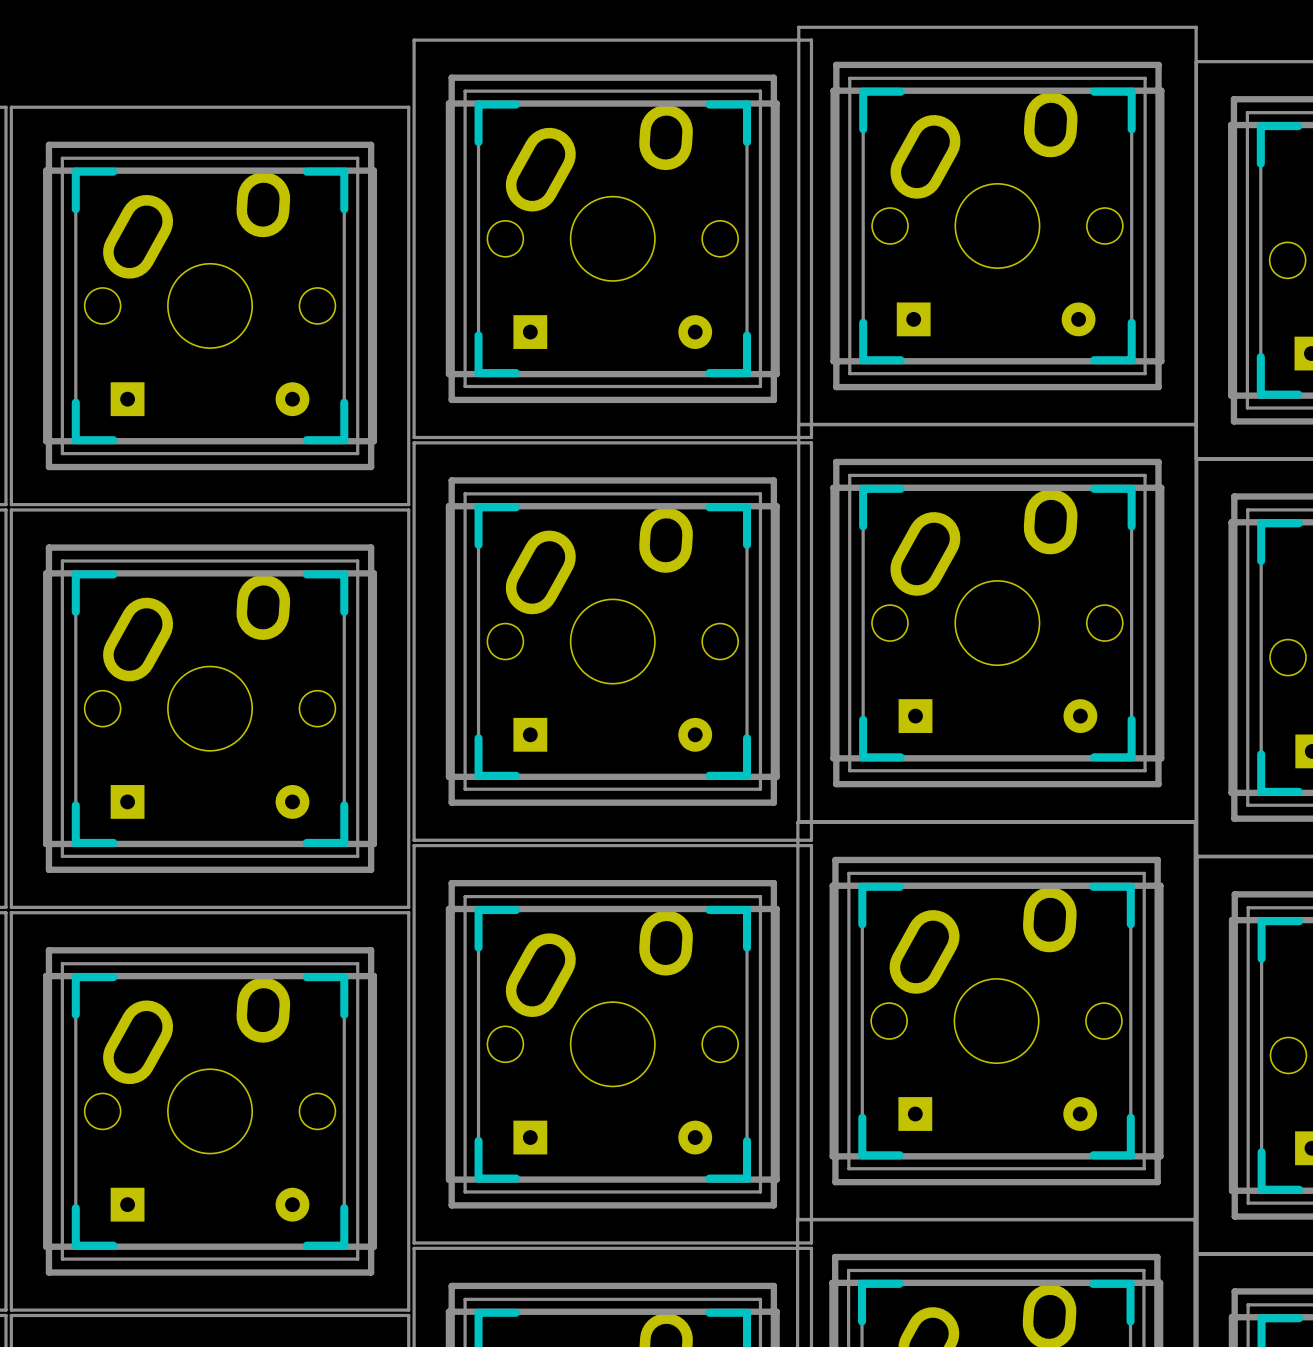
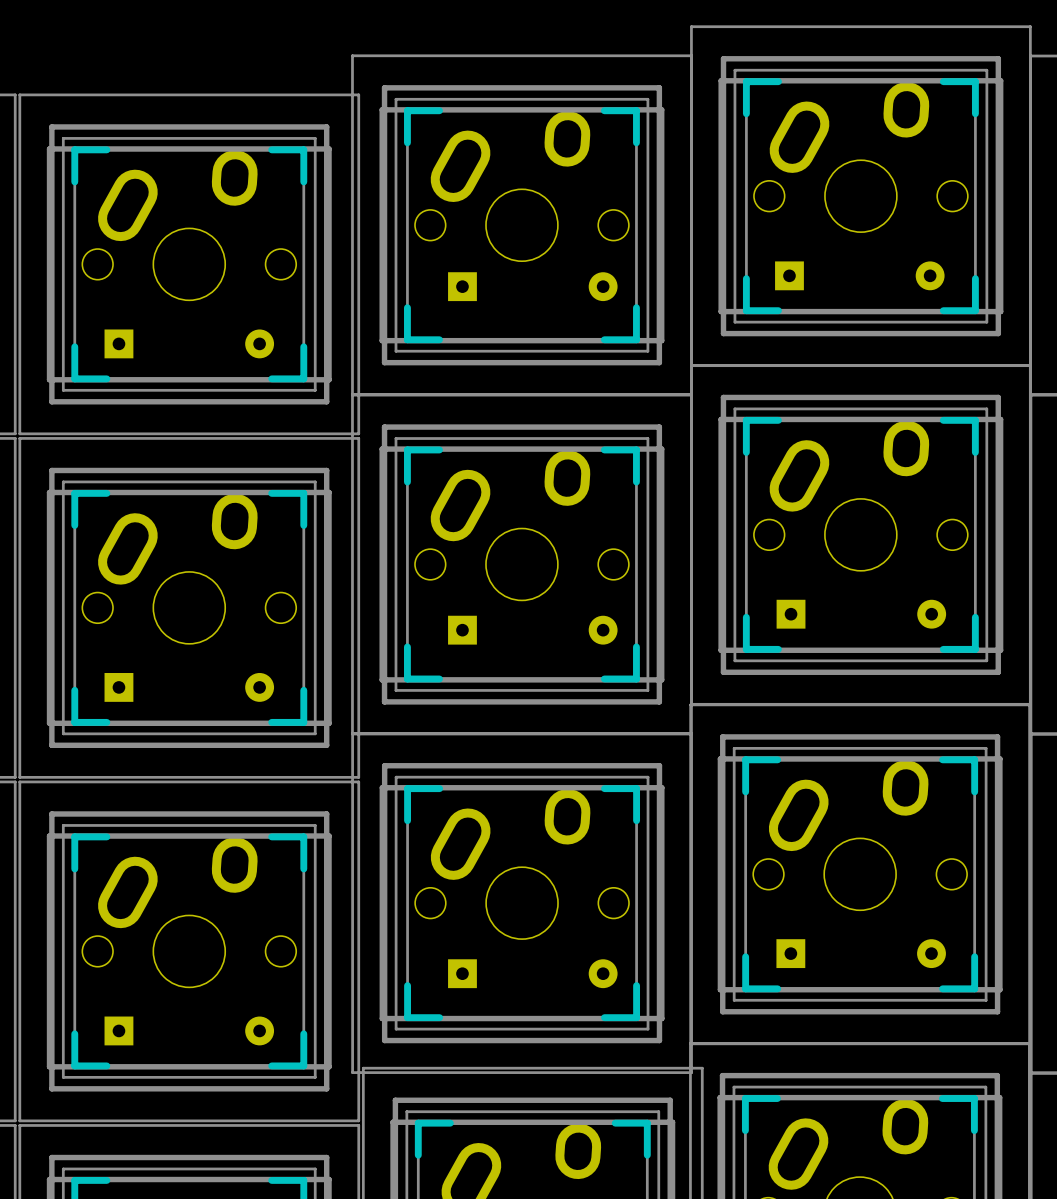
part position: (612, 238) -> (521, 225)
part position: (612, 641) -> (521, 564)
part position: (612, 1044) -> (522, 903)

